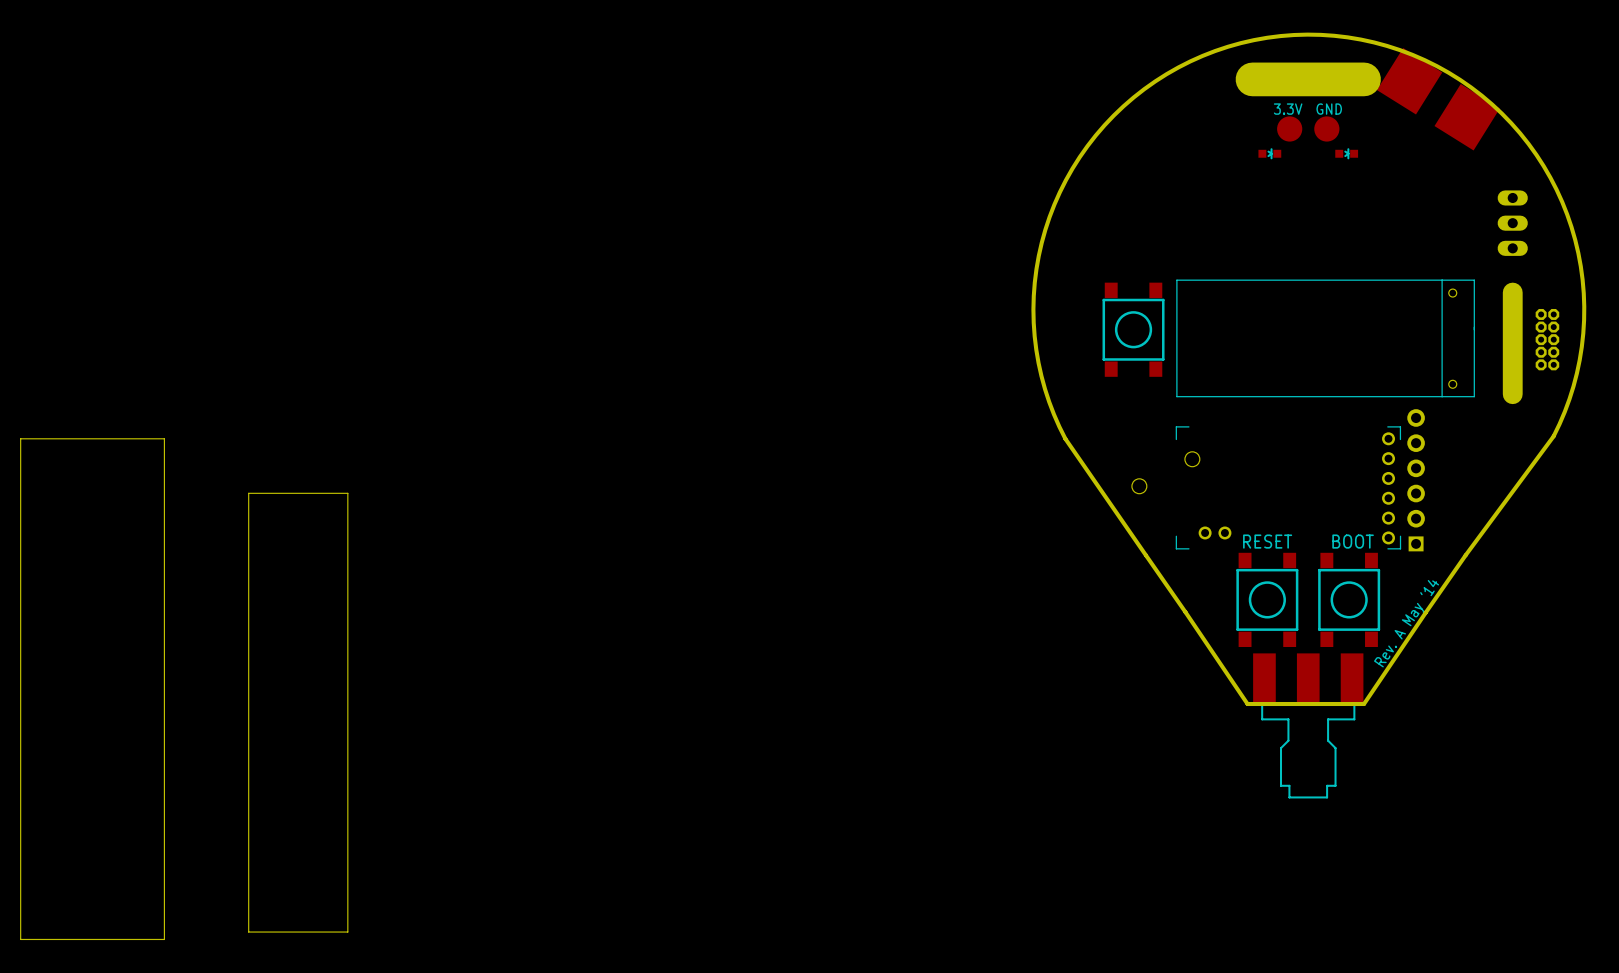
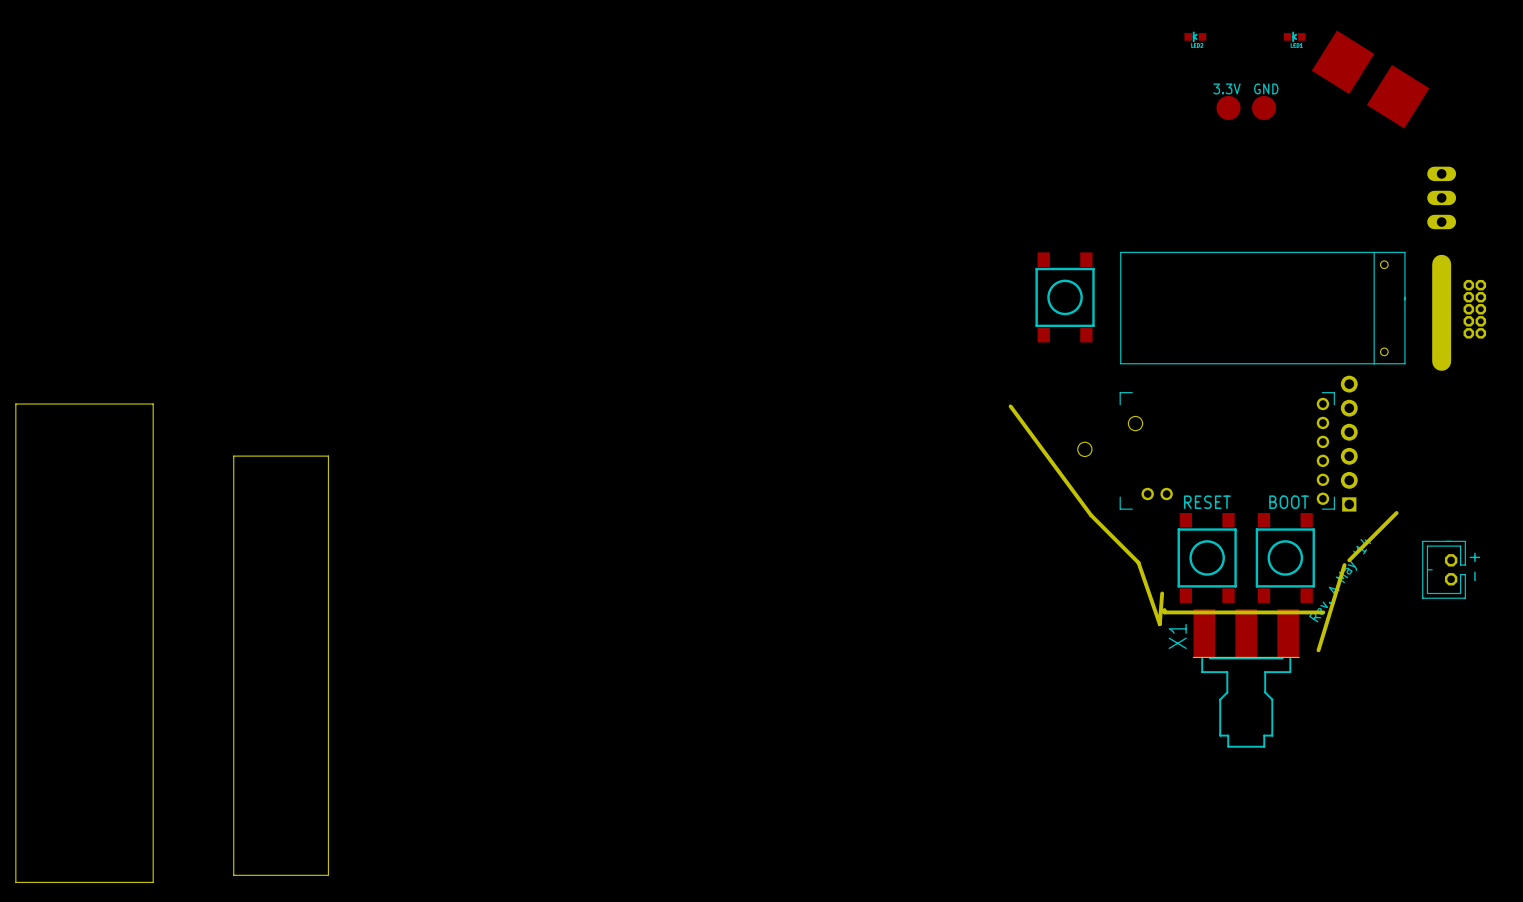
part: none -> (1195, 36)
part: none -> (1294, 36)
board edge: (1252, 79) (1364, 79) -> none
part: (1269, 153) -> none
part: (1346, 153) -> none
part position: (1133, 329) -> (1065, 297)
board edge: (1553, 436) (1465, 555) (1364, 704) (1247, 704) (1065, 438) (1049, 401) (1036, 349) (1033, 295) (1038, 255) (1045, 229) (1065, 180) (1095, 135) (1133, 97) (1178, 67) (1227, 46) (1280, 36) (1334, 35) (1387, 45) (1436, 66) (1481, 95) (1520, 133) (1550, 177) (1571, 227) (1582, 279) (1583, 333) (1573, 386) (1553, 436) -> none
board edge: none -> (1010, 406) (1091, 515) (1138, 562) (1159, 624) (1162, 593)
board edge: none -> (1396, 512) (1349, 560)
board edge: none -> (1344, 565) (1318, 650)
part: none -> (1444, 569)
board edge: none -> (1164, 610) (1164, 612) (1323, 612)
X1 name: none -> X1 (1177, 636)

